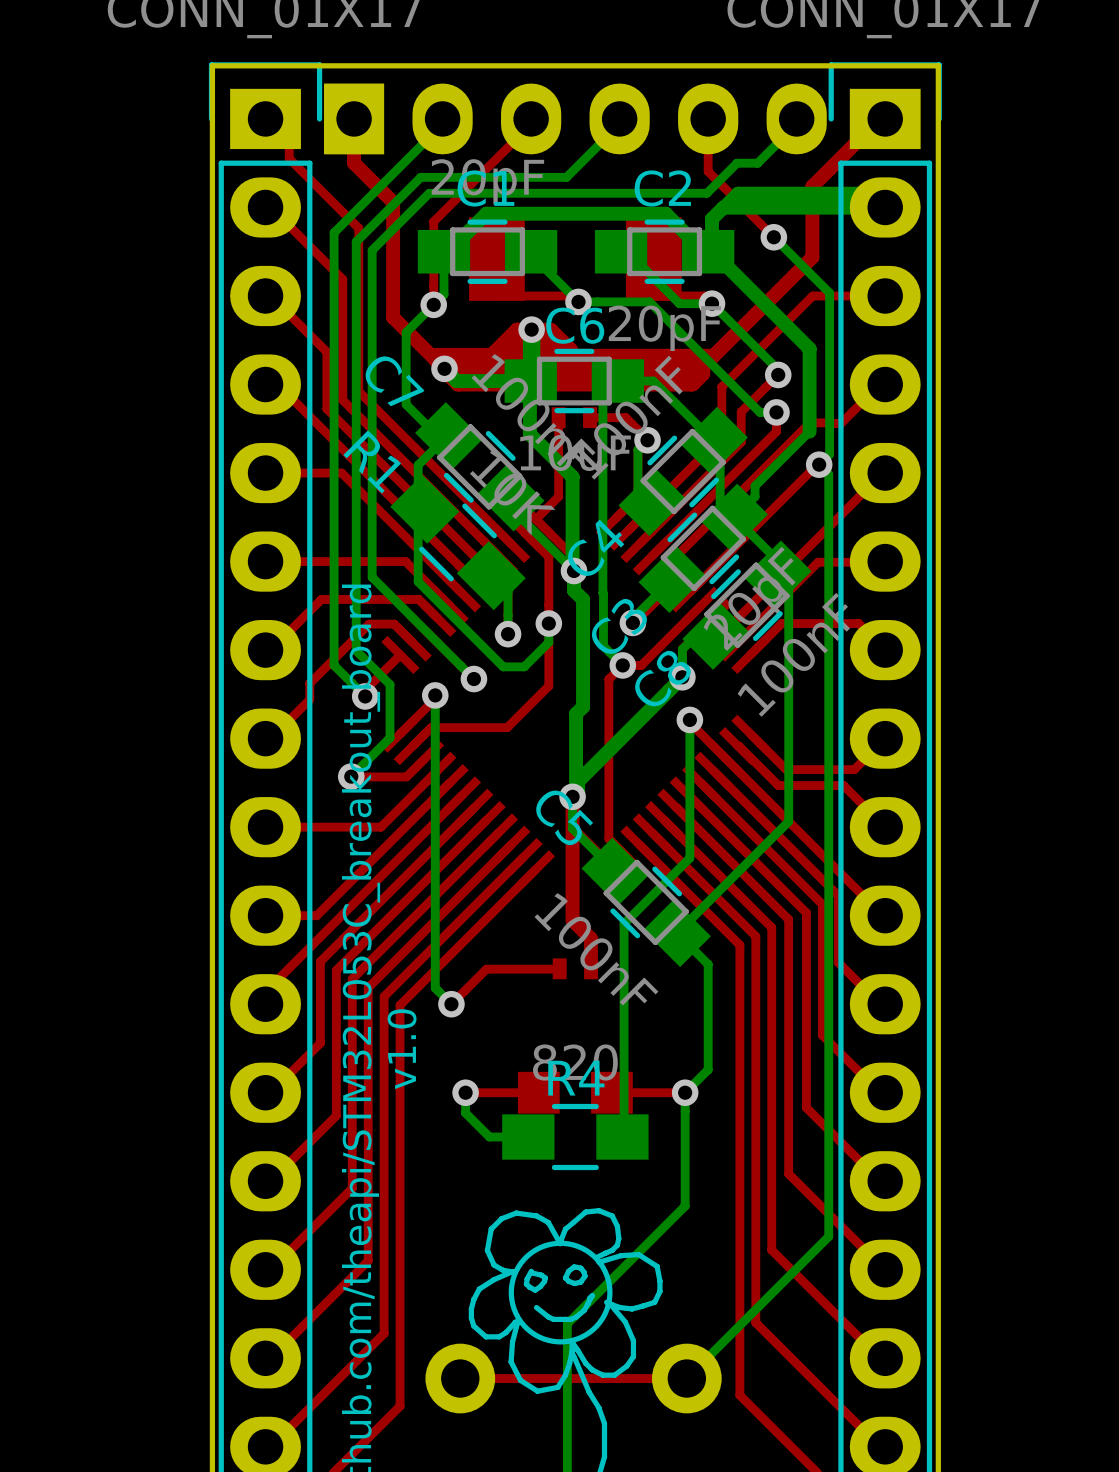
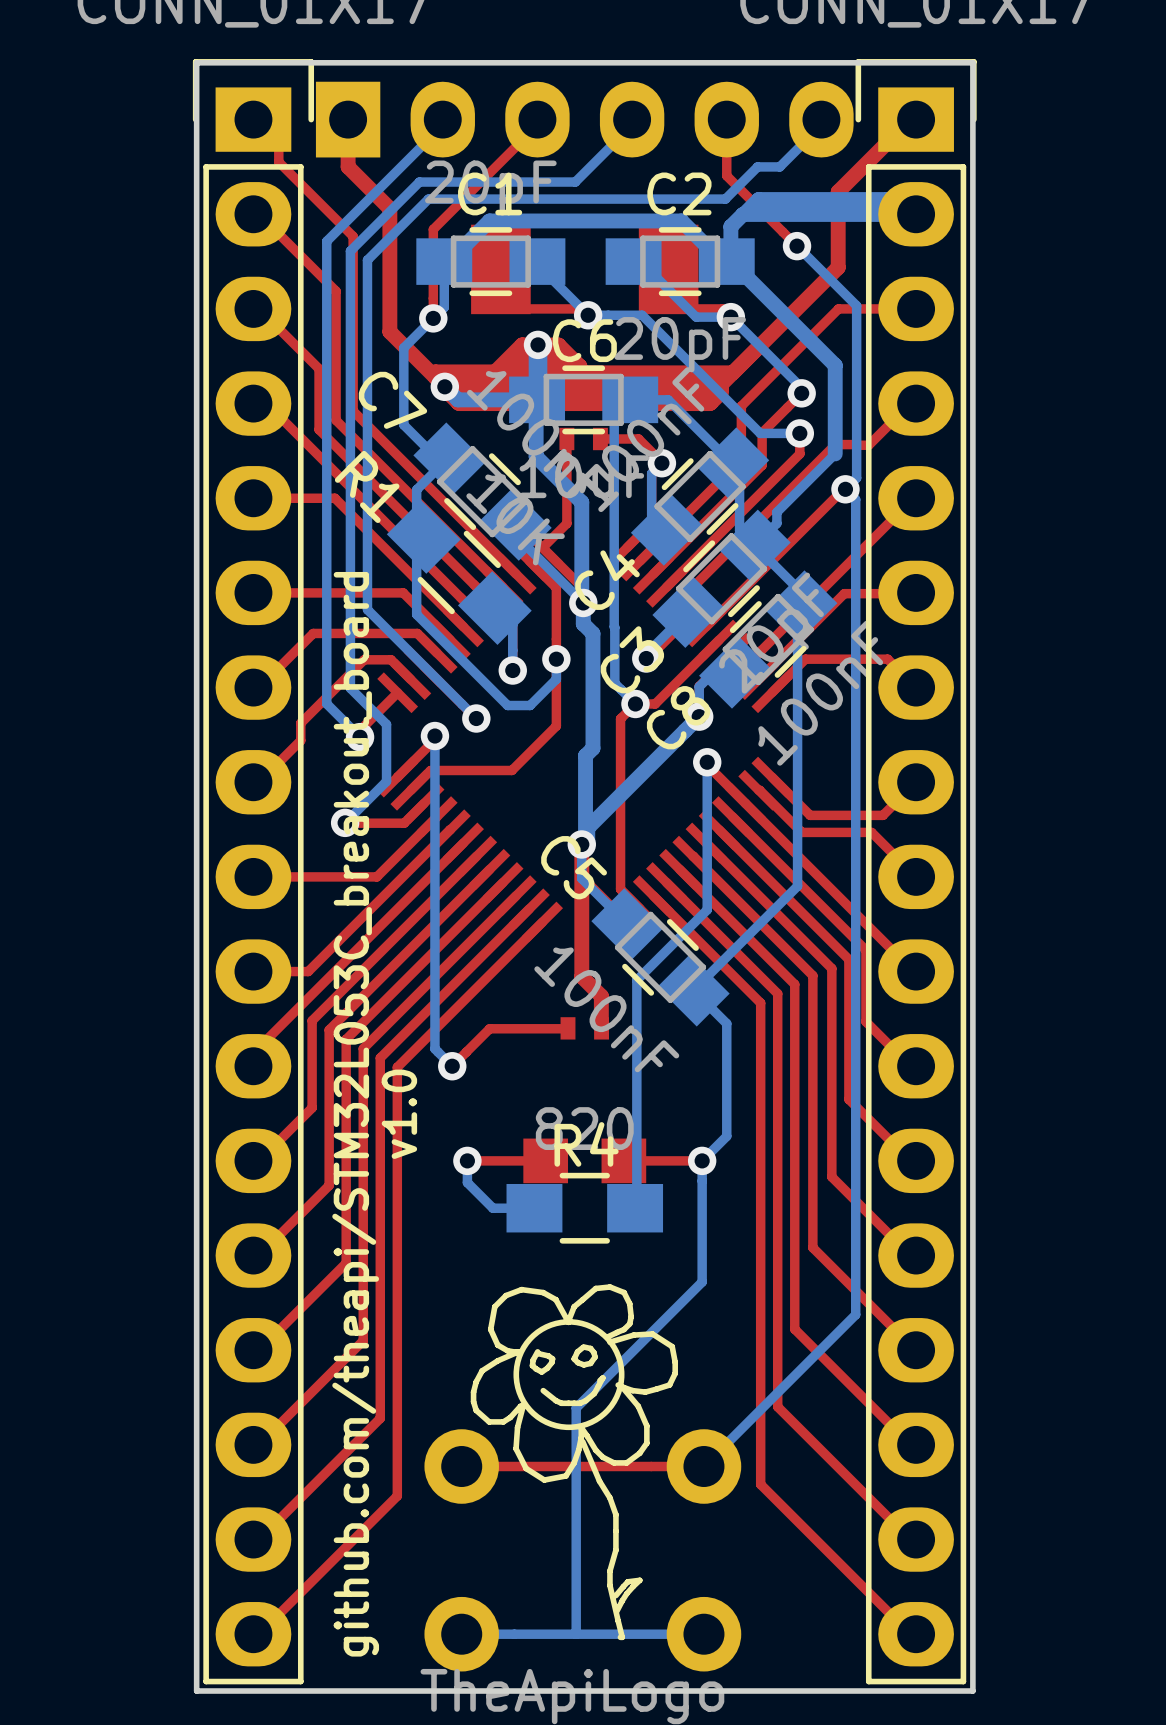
bottom track: (629, 301) (649, 301) (759, 412) -> (642, 315) (760, 433) (782, 433)
bottom track: (774, 557) (788, 571) (788, 821) (774, 835) -> (797, 588) (797, 886)

